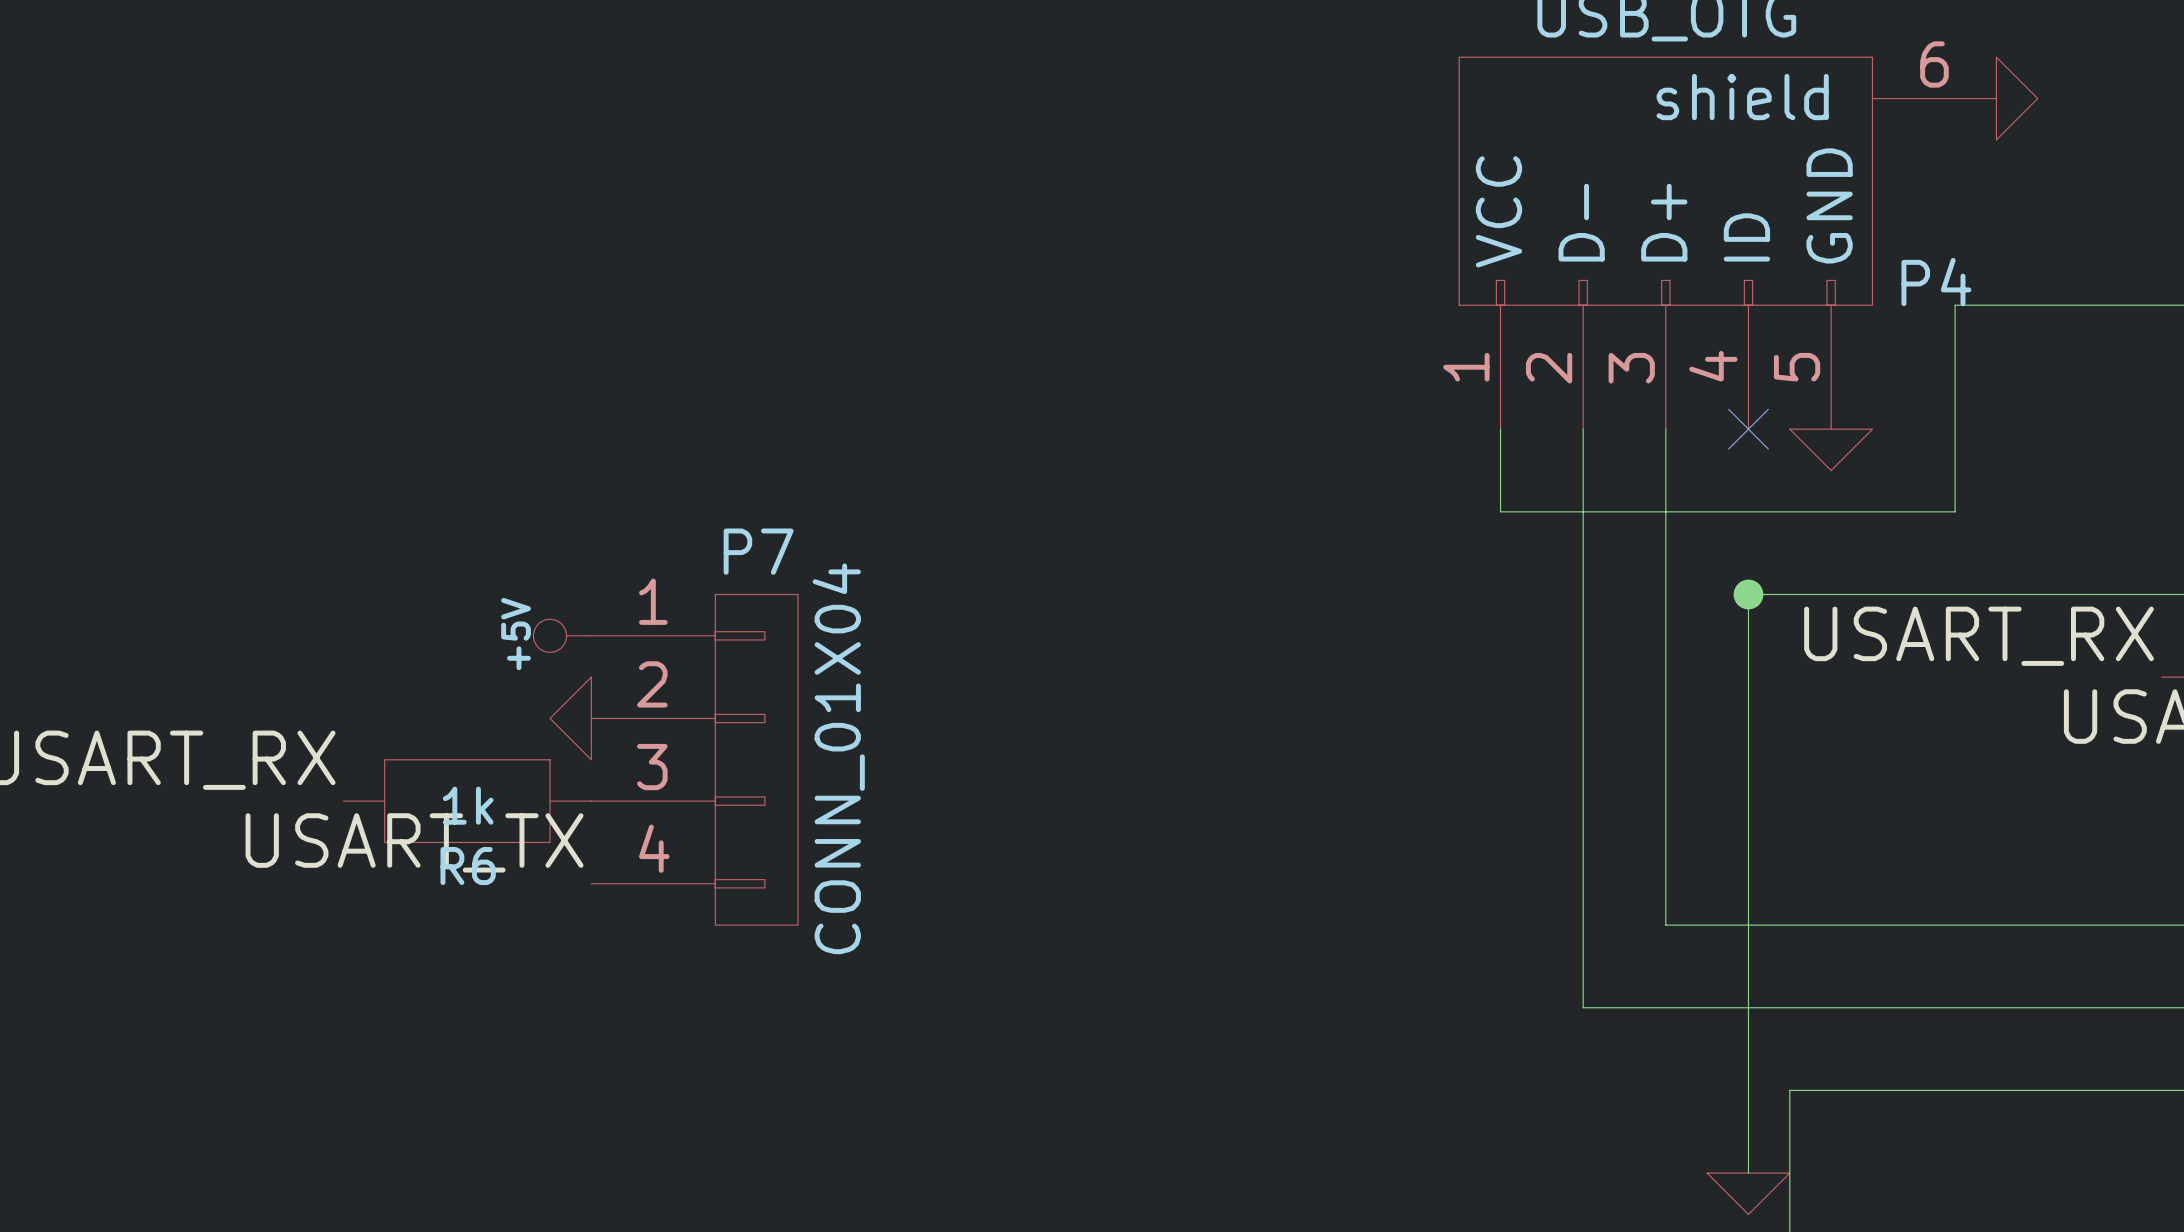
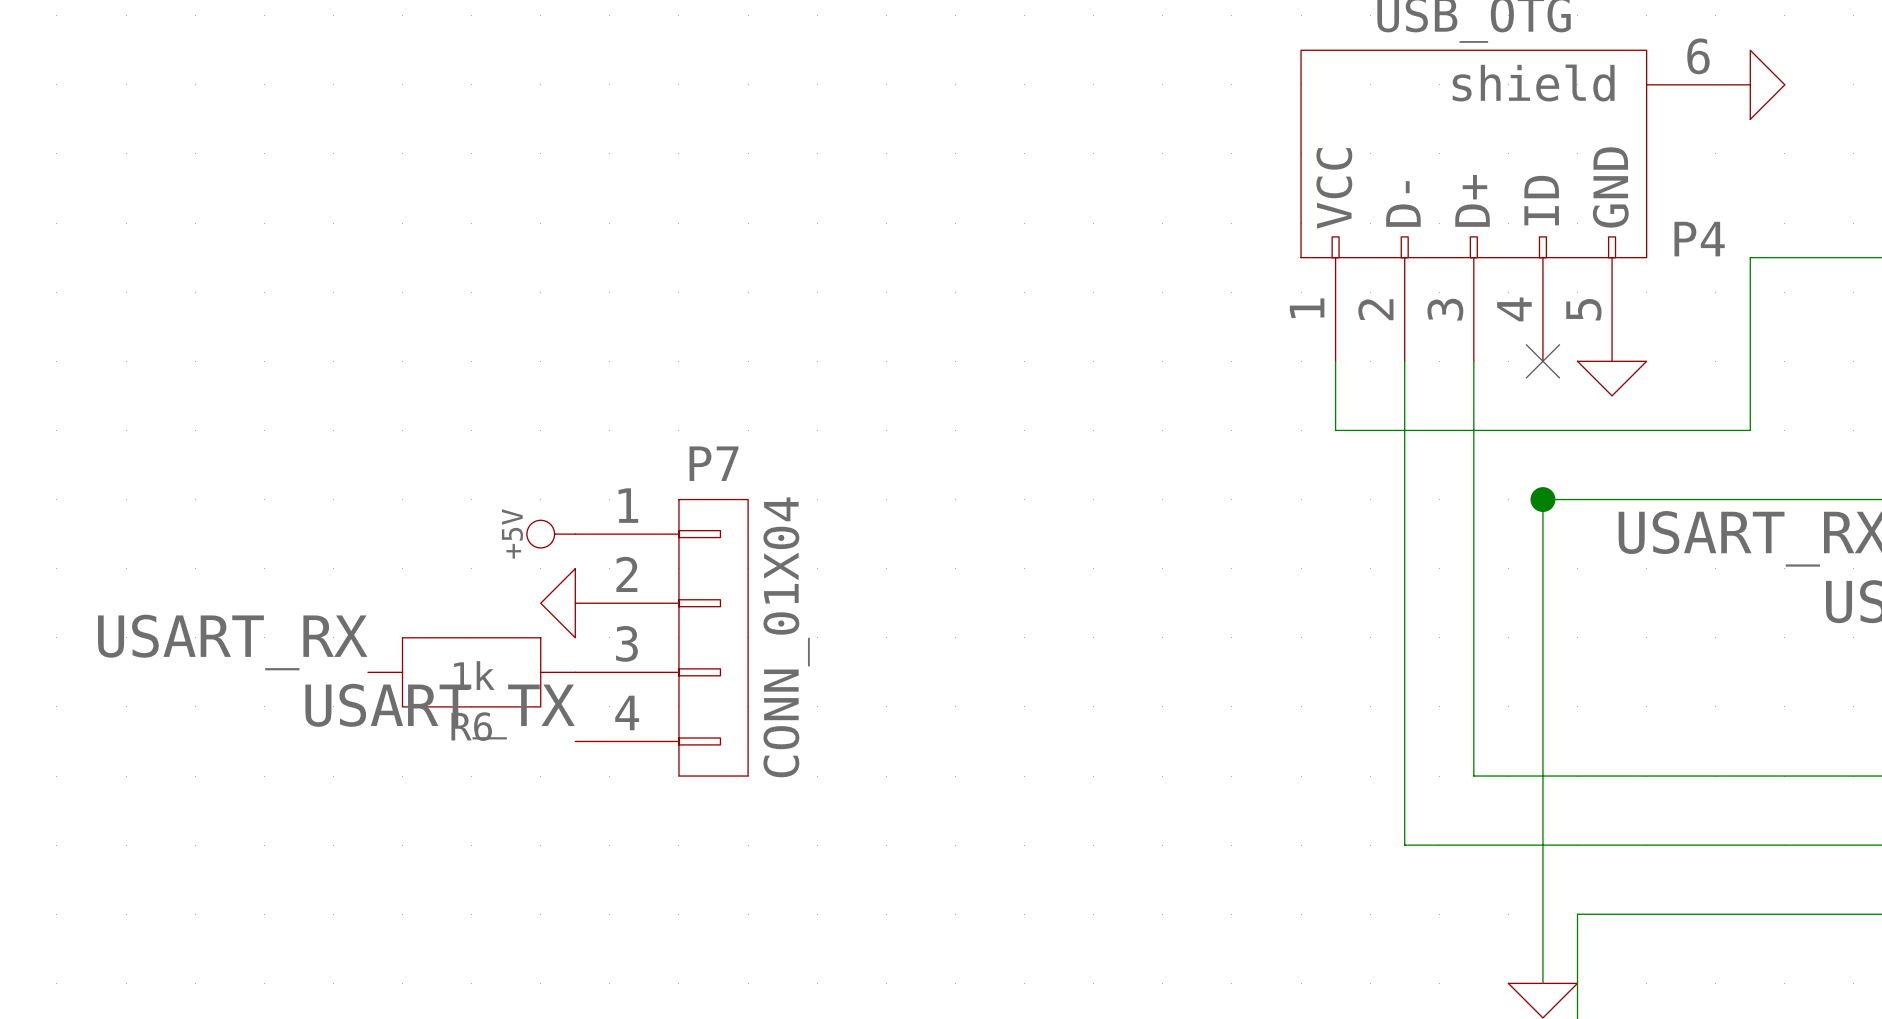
wire: (1996, 305) (1955, 305) (1955, 511) -> (1750, 257) (1750, 430) (1715, 430)

